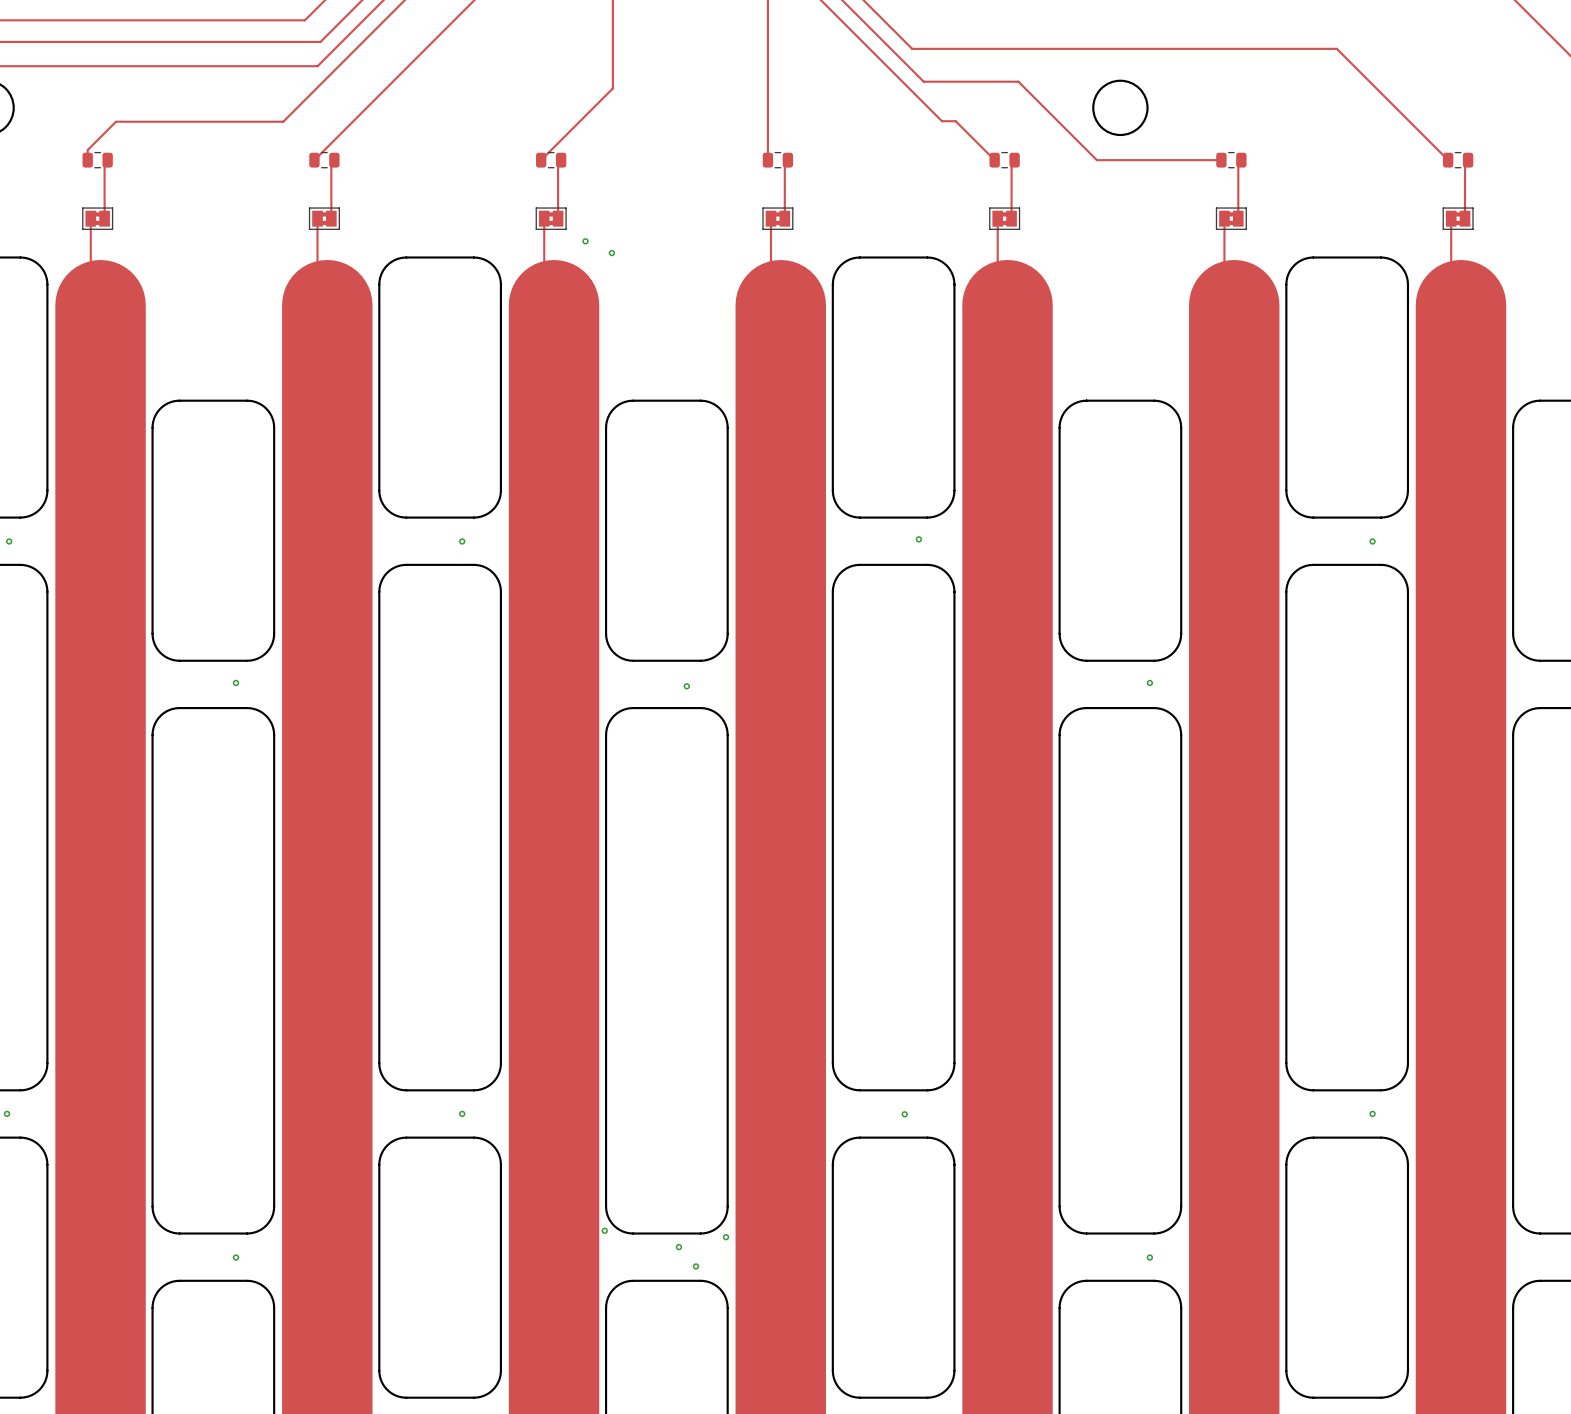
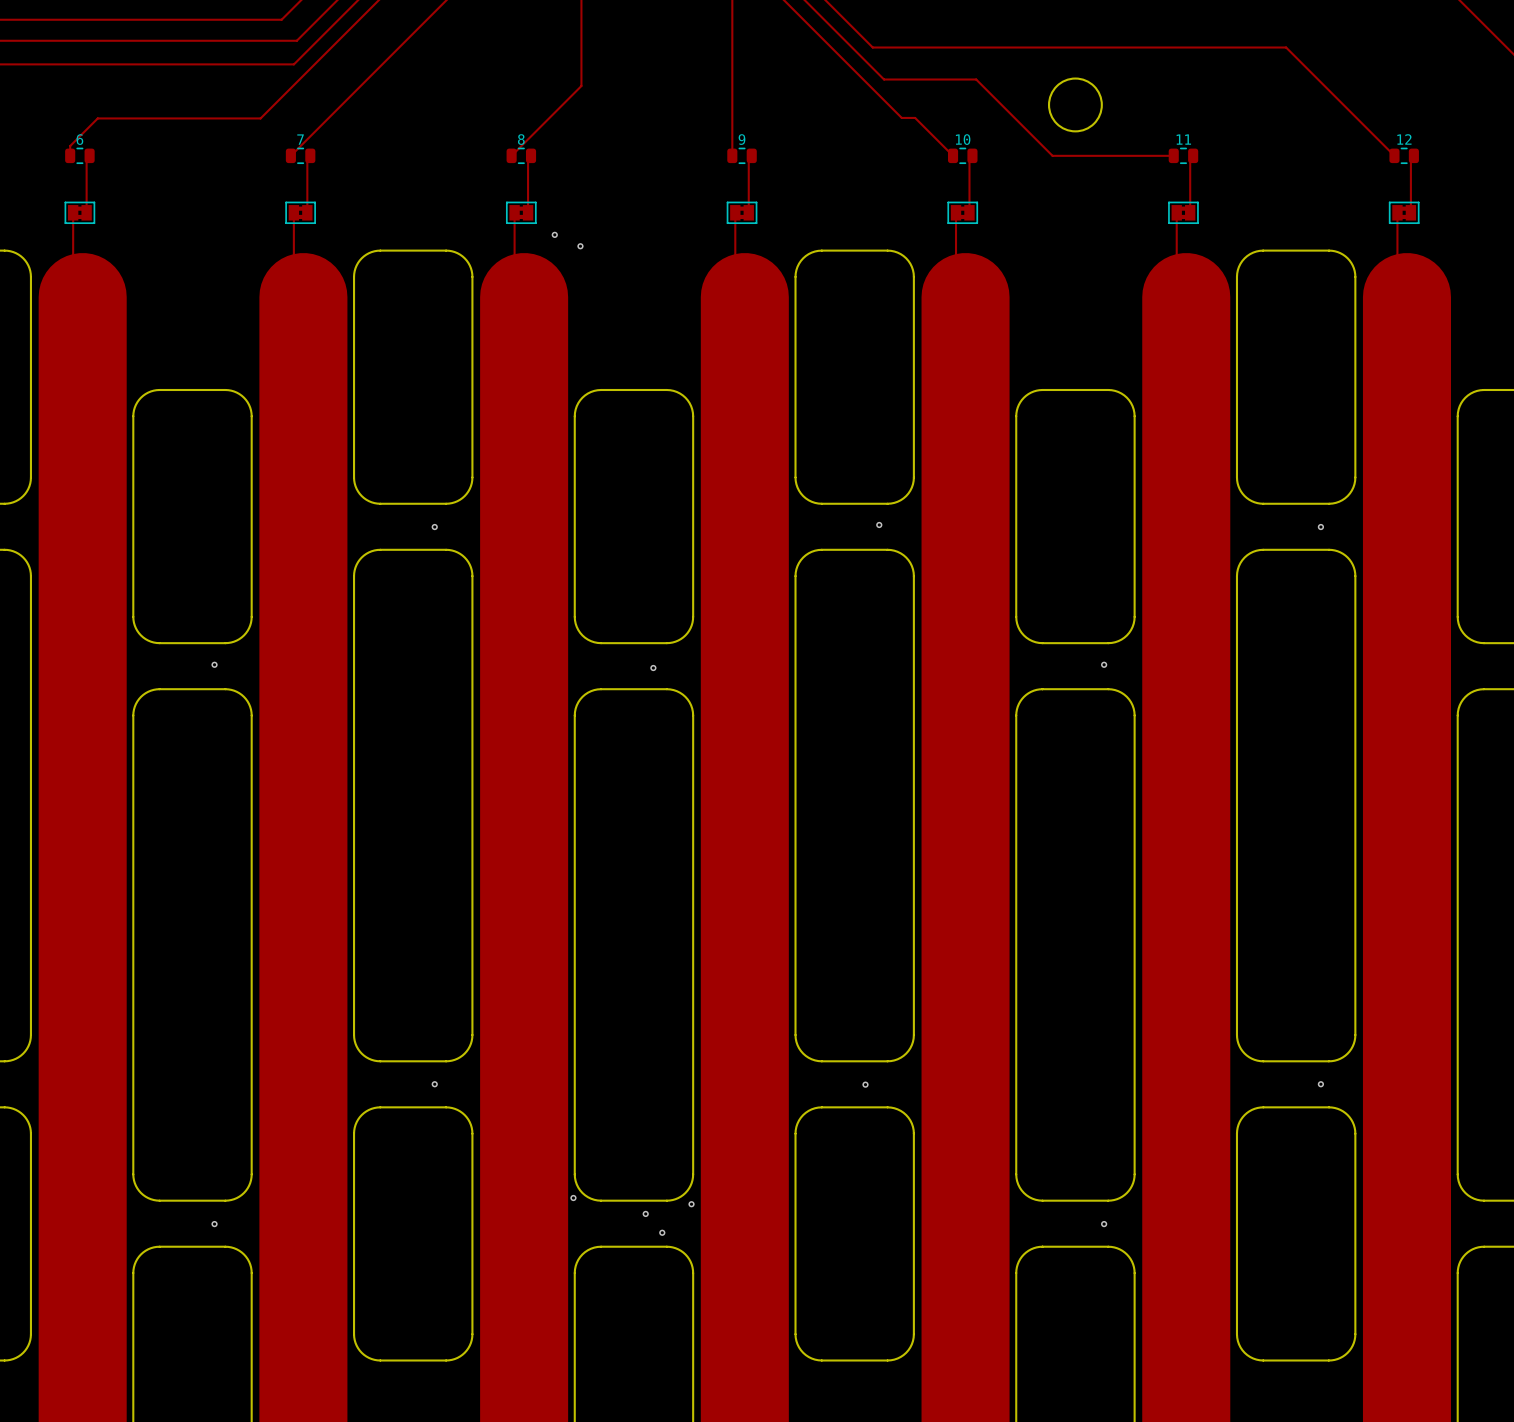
text: none -> 6 (79, 139)
text: none -> 7 (300, 139)
text: none -> 8 (521, 139)
text: none -> 9 (741, 139)
text: none -> 10 (963, 139)
text: none -> 11 (1183, 139)
text: none -> 12 (1404, 139)

